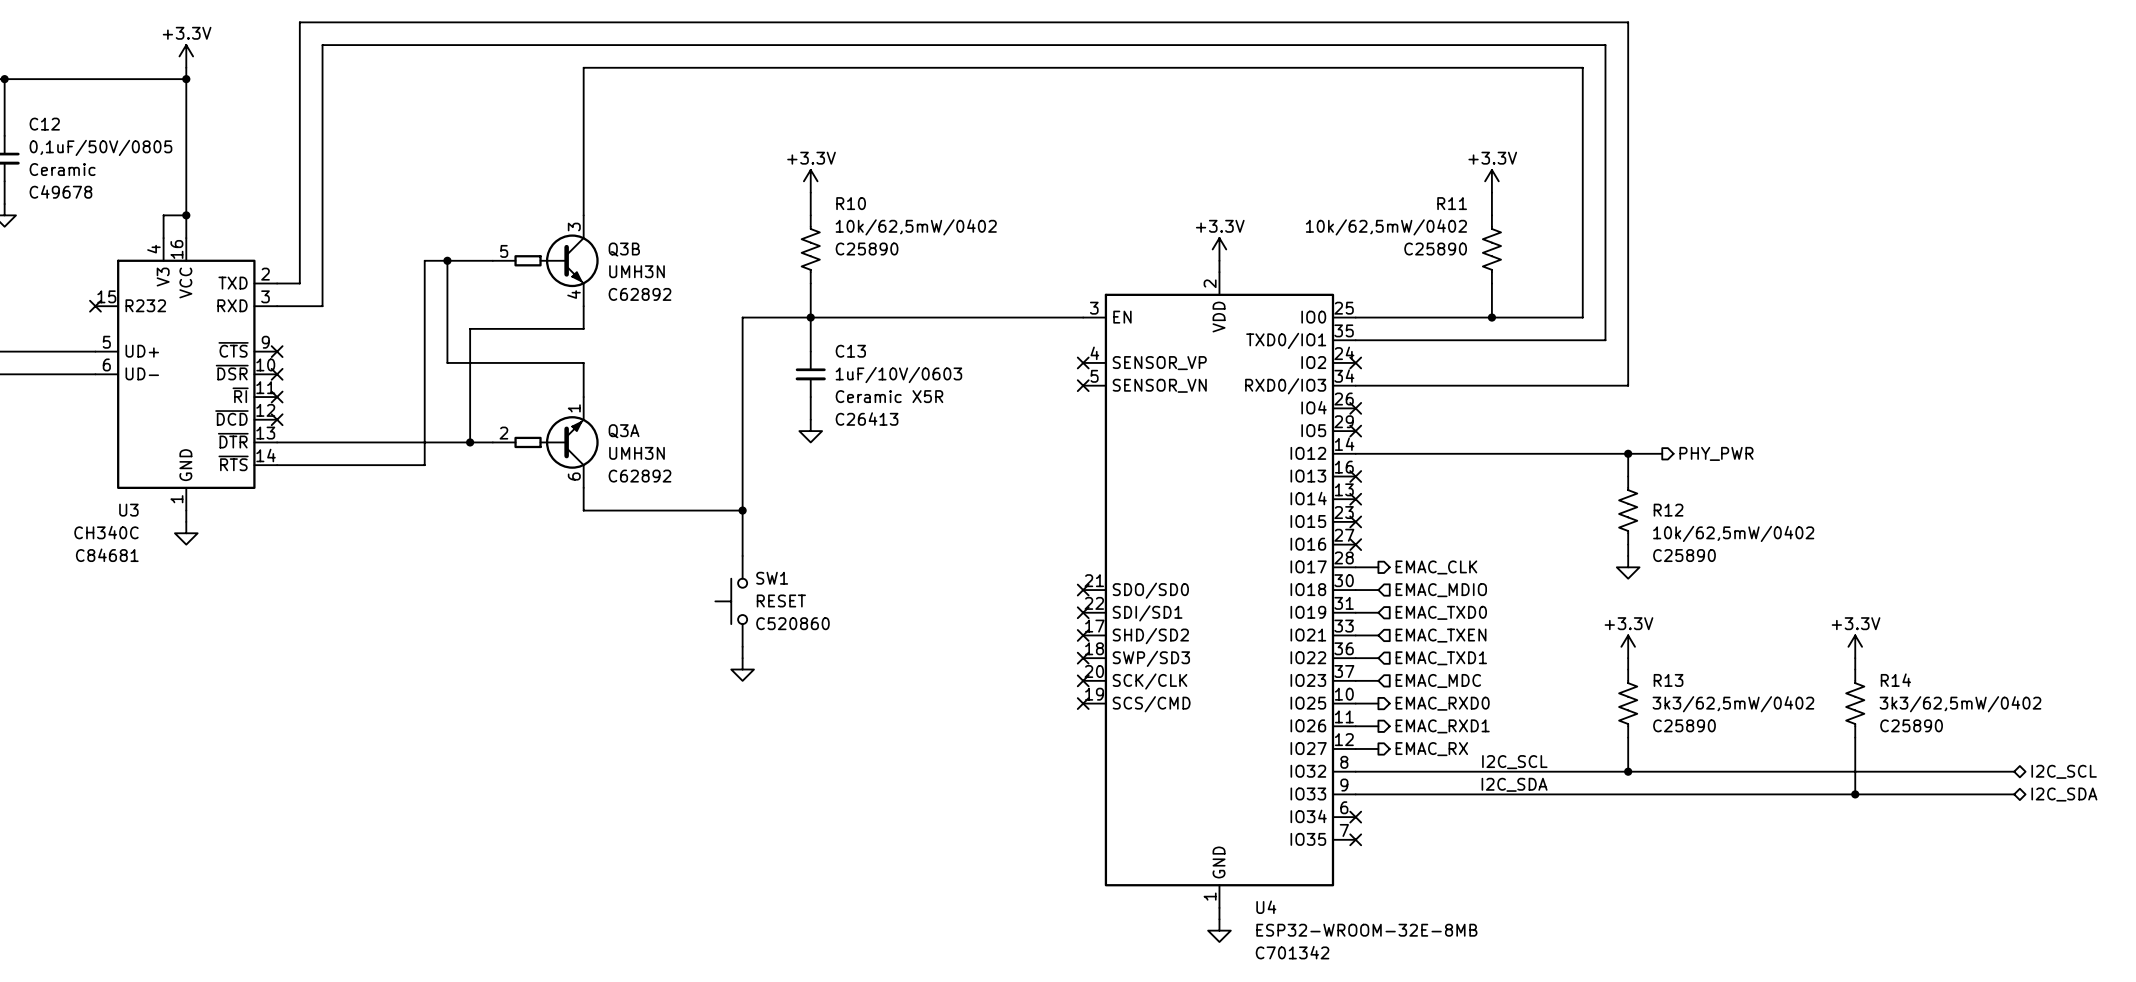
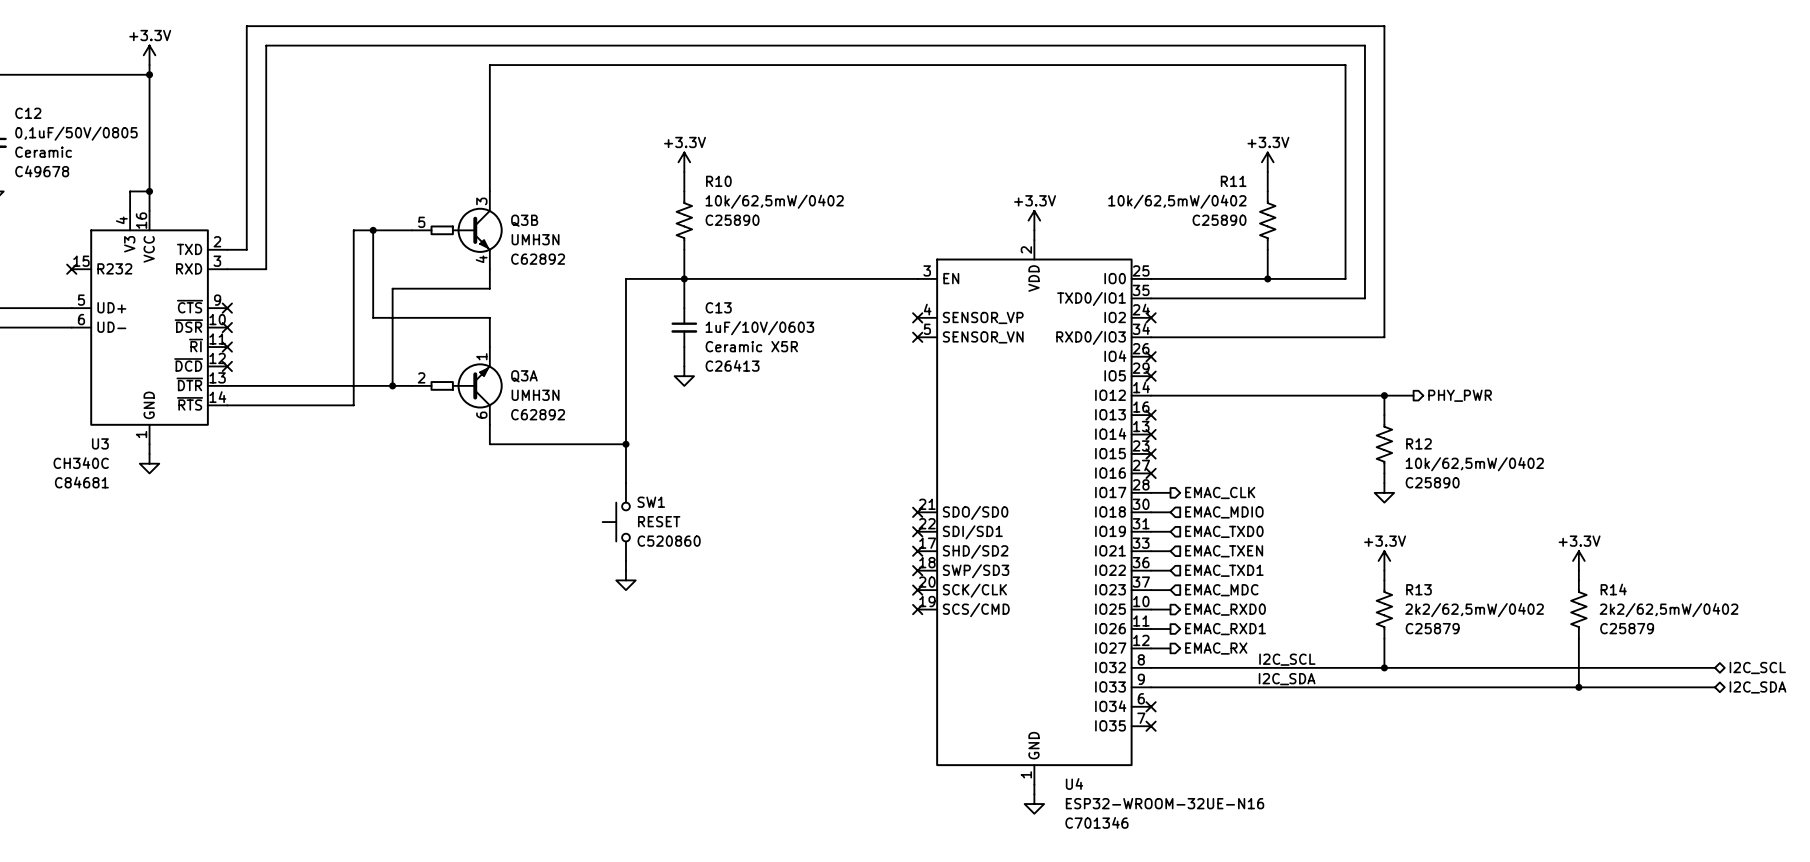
R13 value: 3k3/62,5mW/0402 (1733, 704) -> 2k2/62,5mW/0402 (1474, 610)
R14 value: 3k3/62,5mW/0402 (1960, 704) -> 2k2/62,5mW/0402 (1669, 610)
R13 text: C25890 (1684, 725) -> C25879 (1432, 628)
R14 text: C25890 (1911, 725) -> C25879 (1627, 628)
U4 value: ESP32-WROOM-32E-8MB (1366, 930) -> ESP32-WROOM-32UE-N16 (1165, 803)
U4 text: C701342 (1292, 952) -> C701346 (1096, 822)

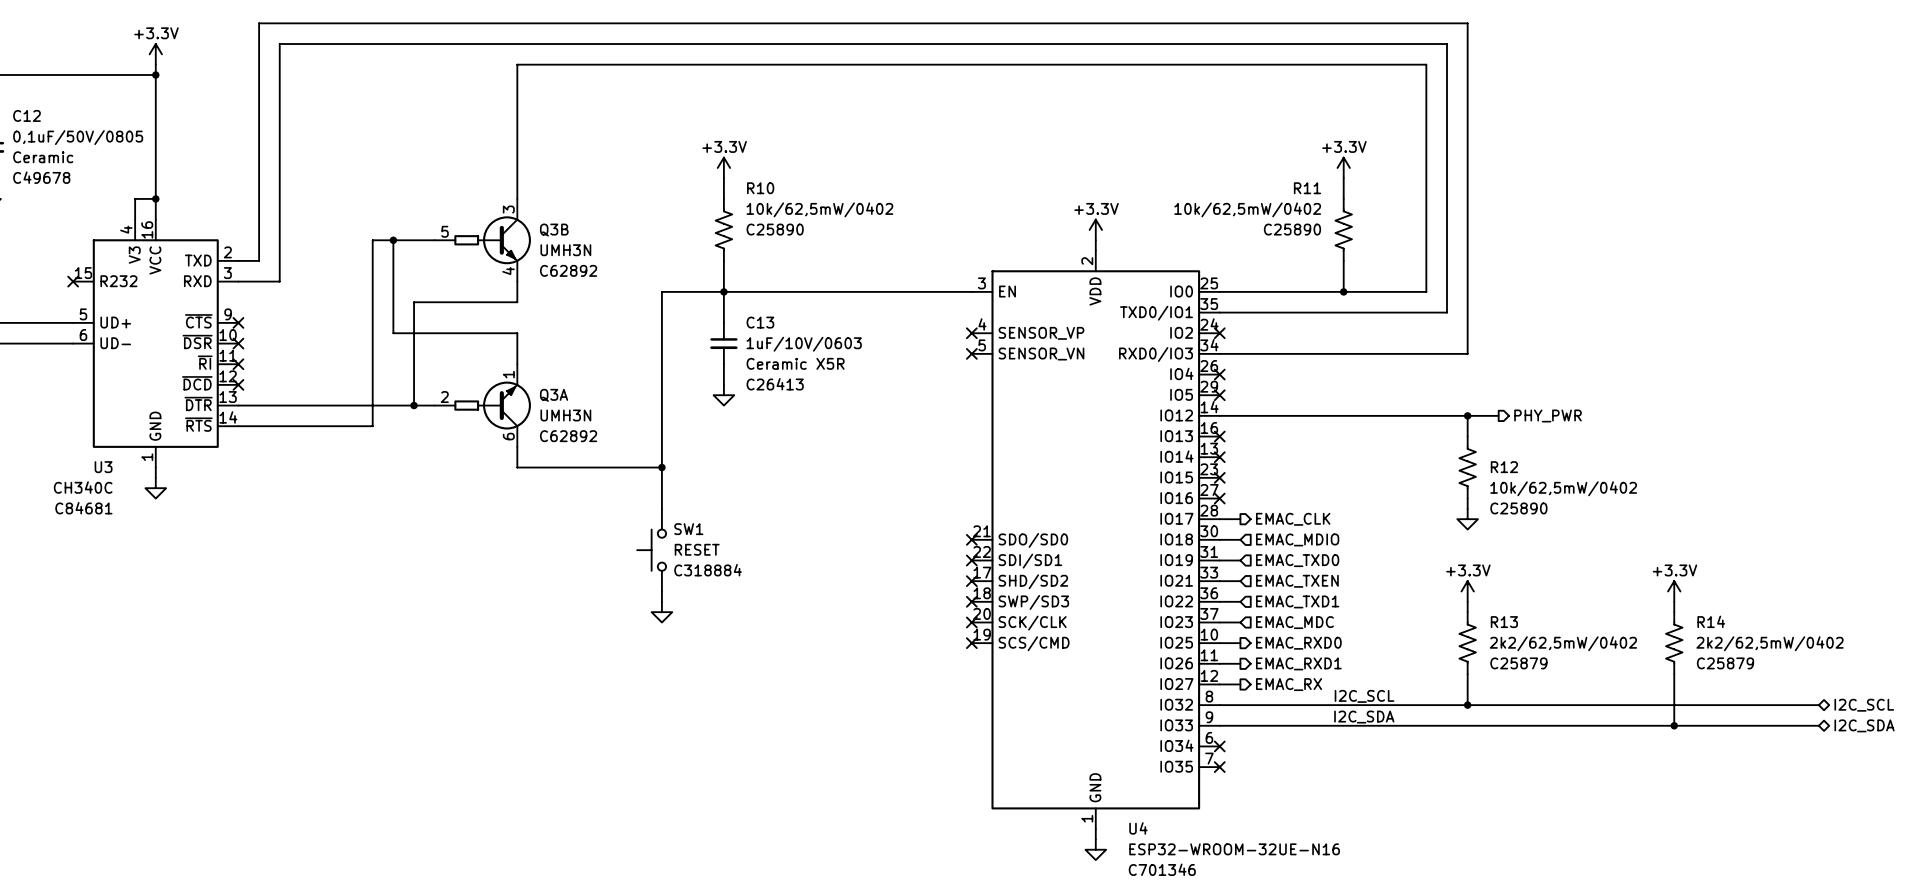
SW1 text: C520860 (669, 541) -> C318884 (708, 570)

